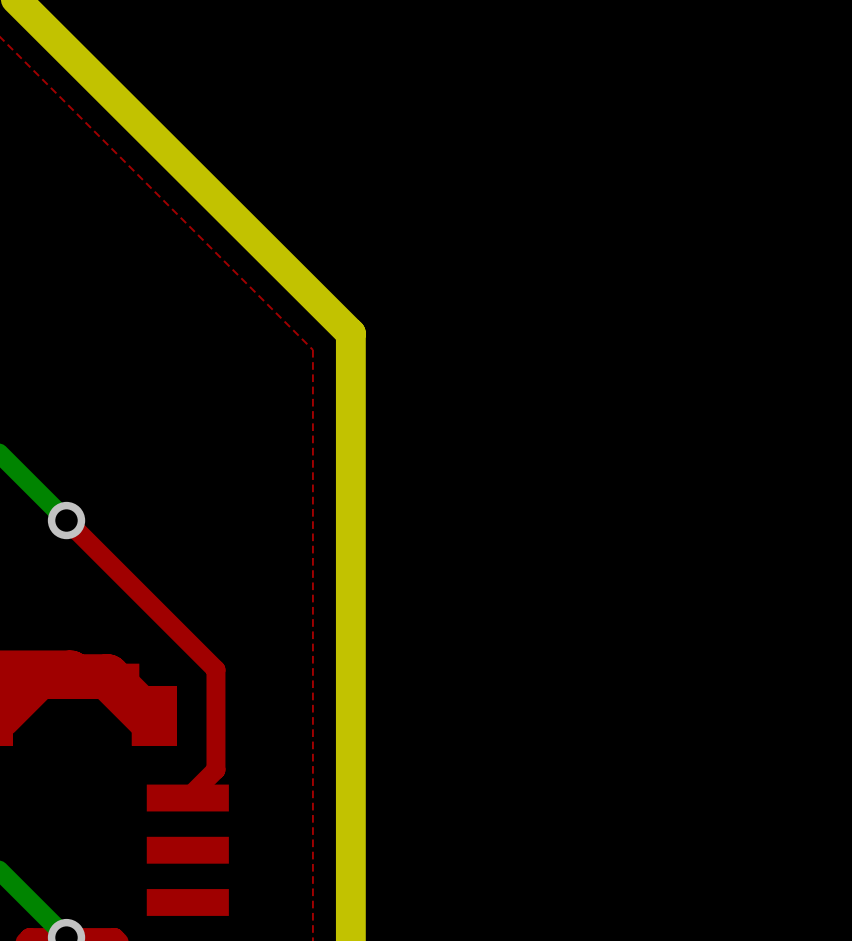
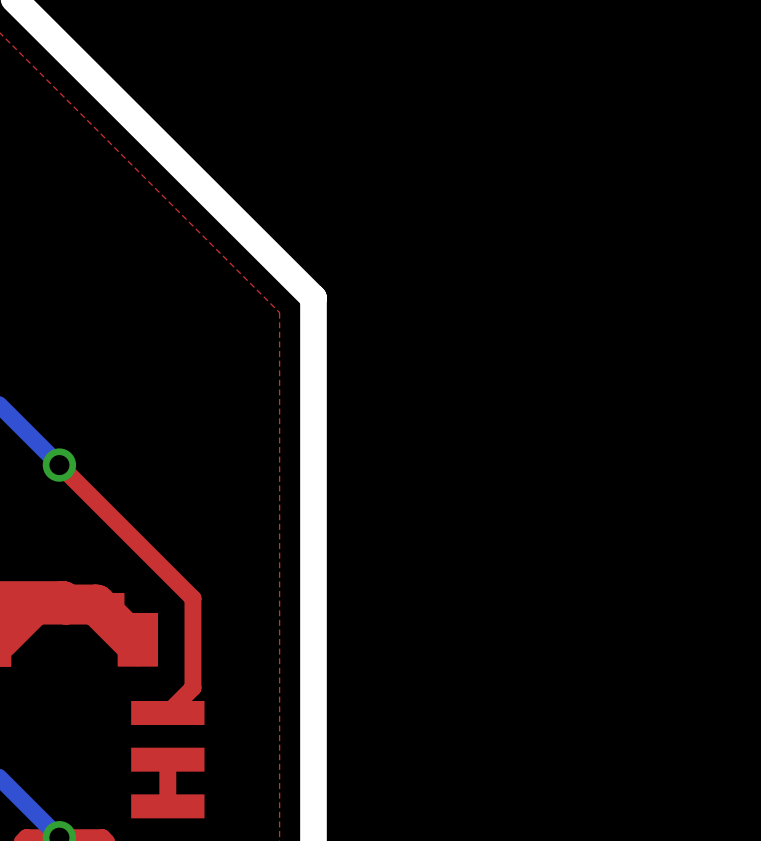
top track: none -> (167, 759) (167, 806)

